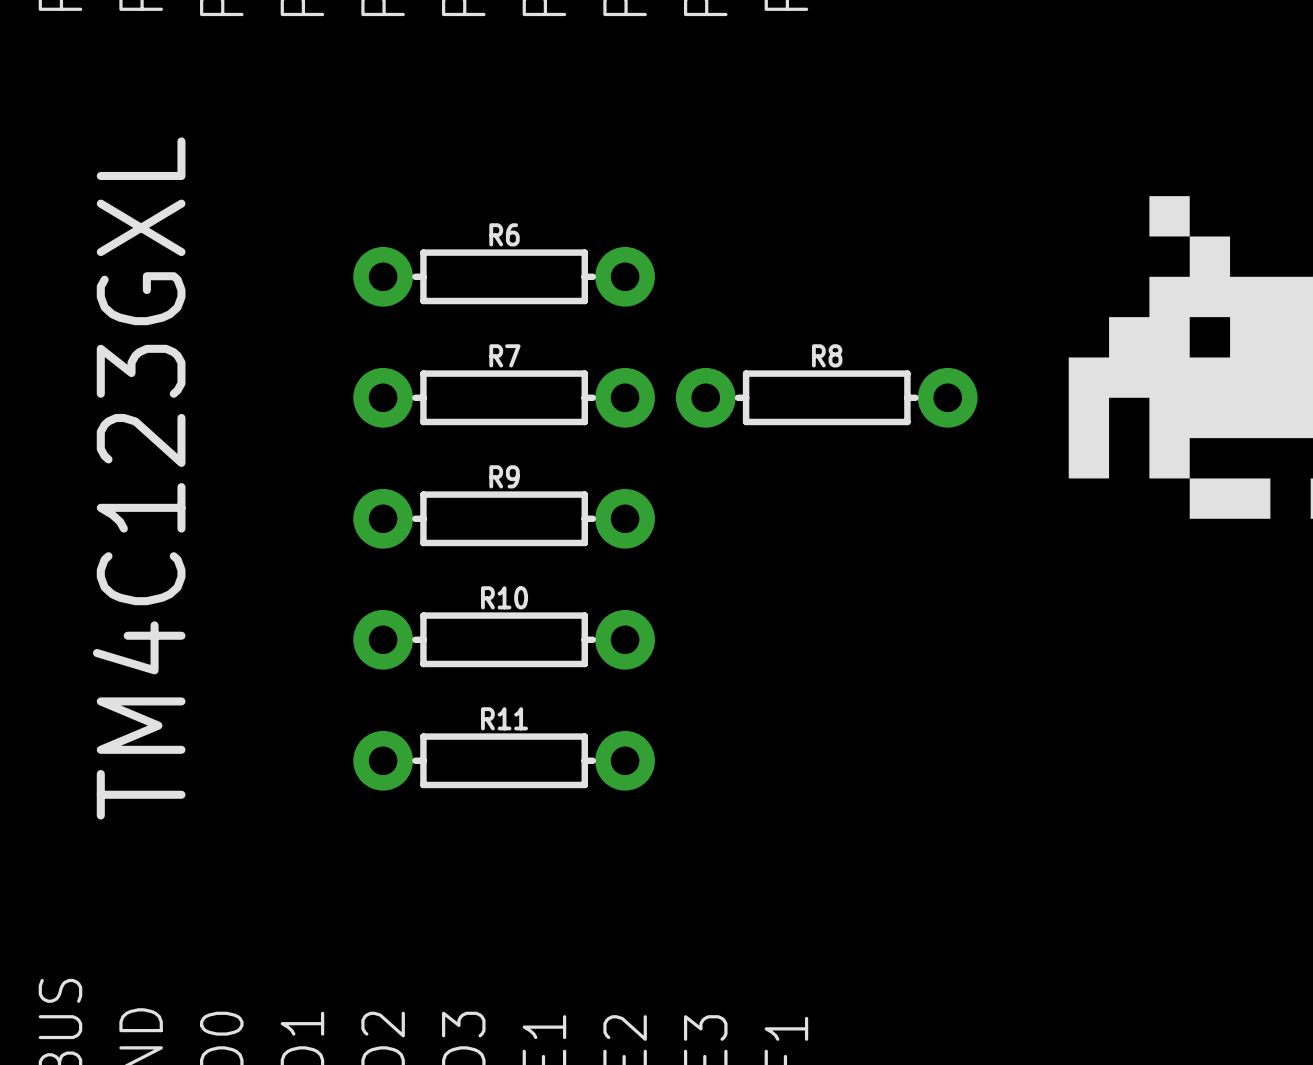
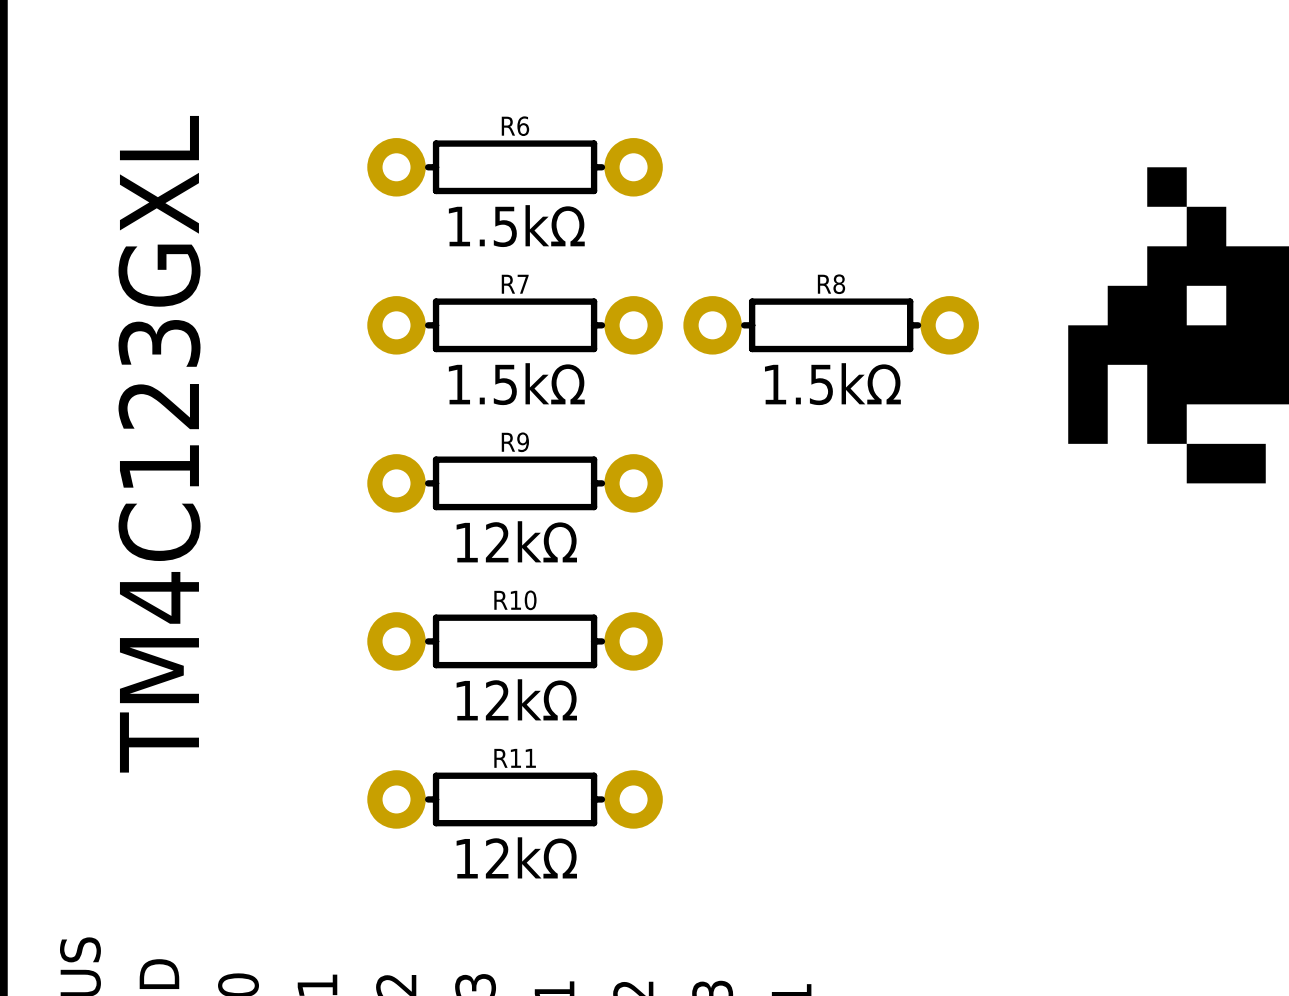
text: none -> 1.5kΩ (516, 226)
R6 position: (504, 276) -> (515, 167)
R7 position: (504, 397) -> (515, 325)
R8 position: (826, 397) -> (831, 325)
text: none -> 1.5kΩ (516, 384)
text: none -> 1.5kΩ (832, 384)
text: none -> 12kΩ (516, 541)
R10 position: (504, 639) -> (515, 641)
text: none -> 12kΩ (516, 699)
R11 position: (504, 760) -> (515, 799)
text: none -> 12kΩ (516, 857)

